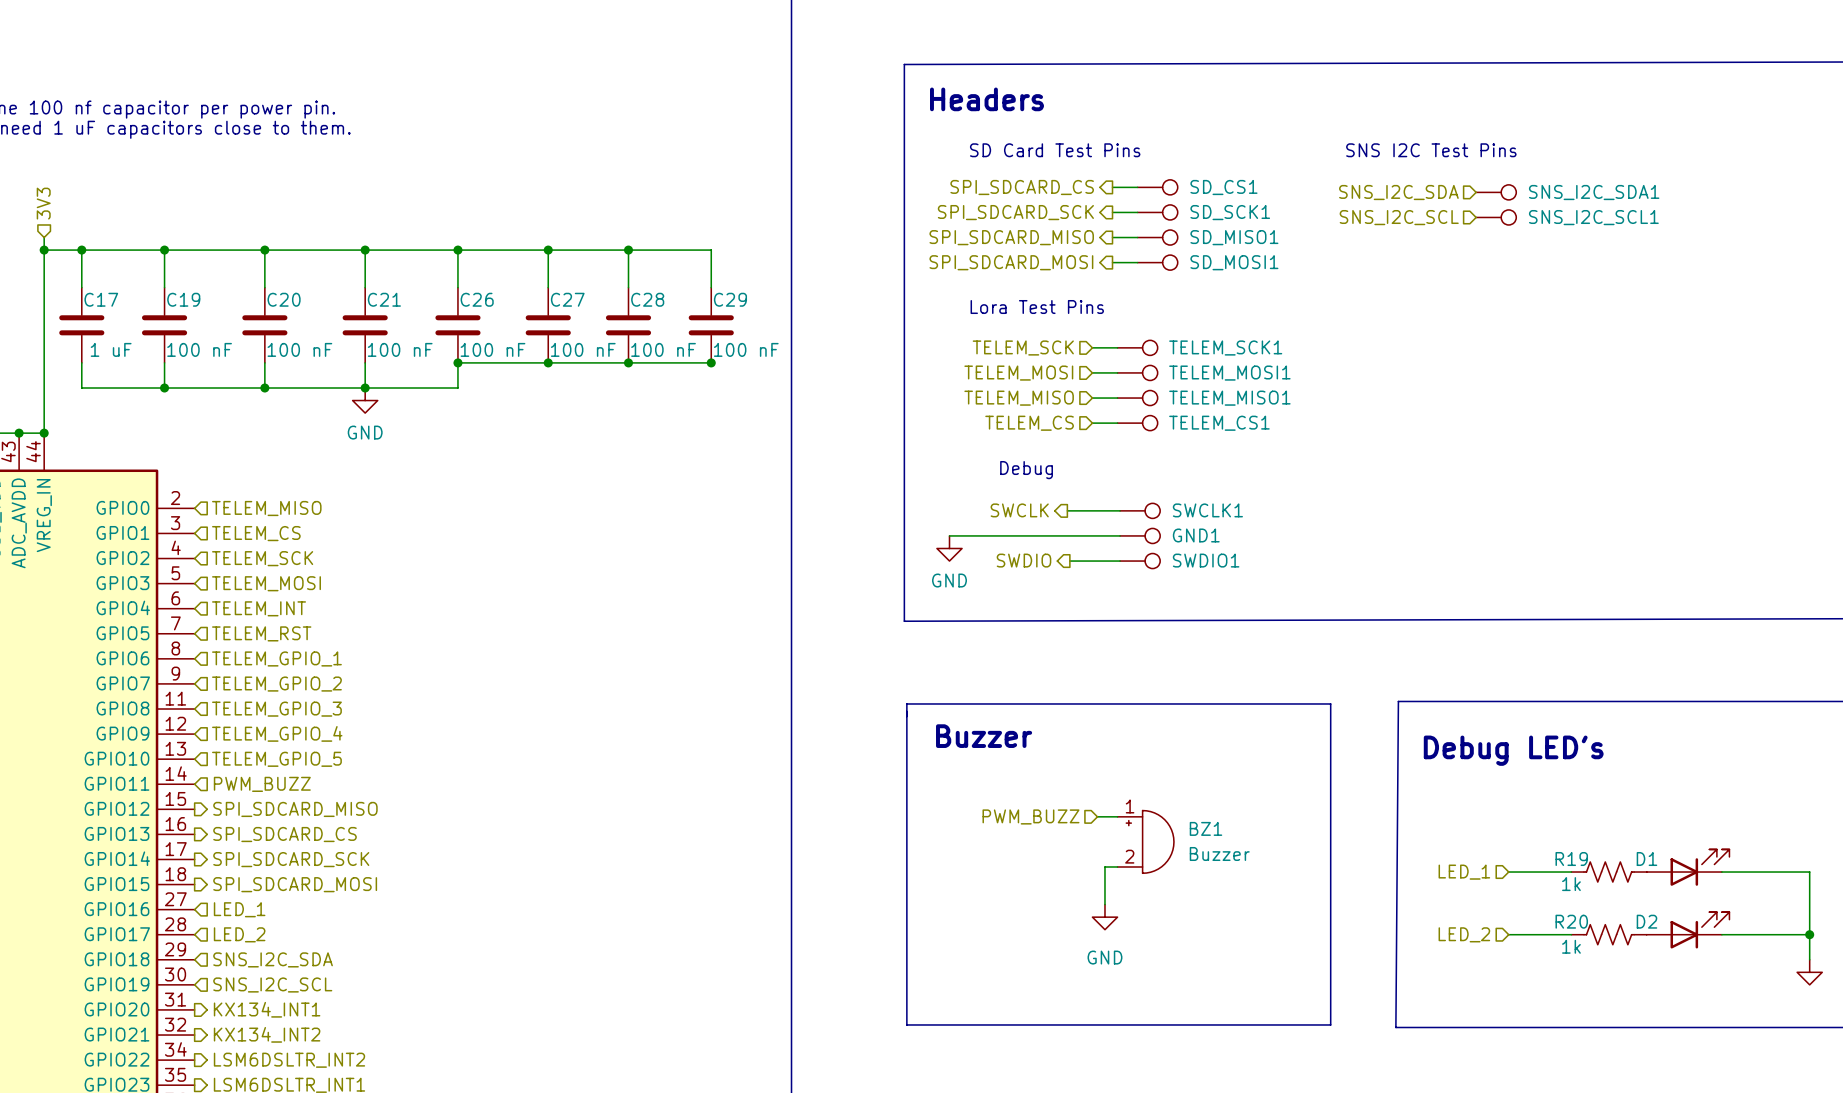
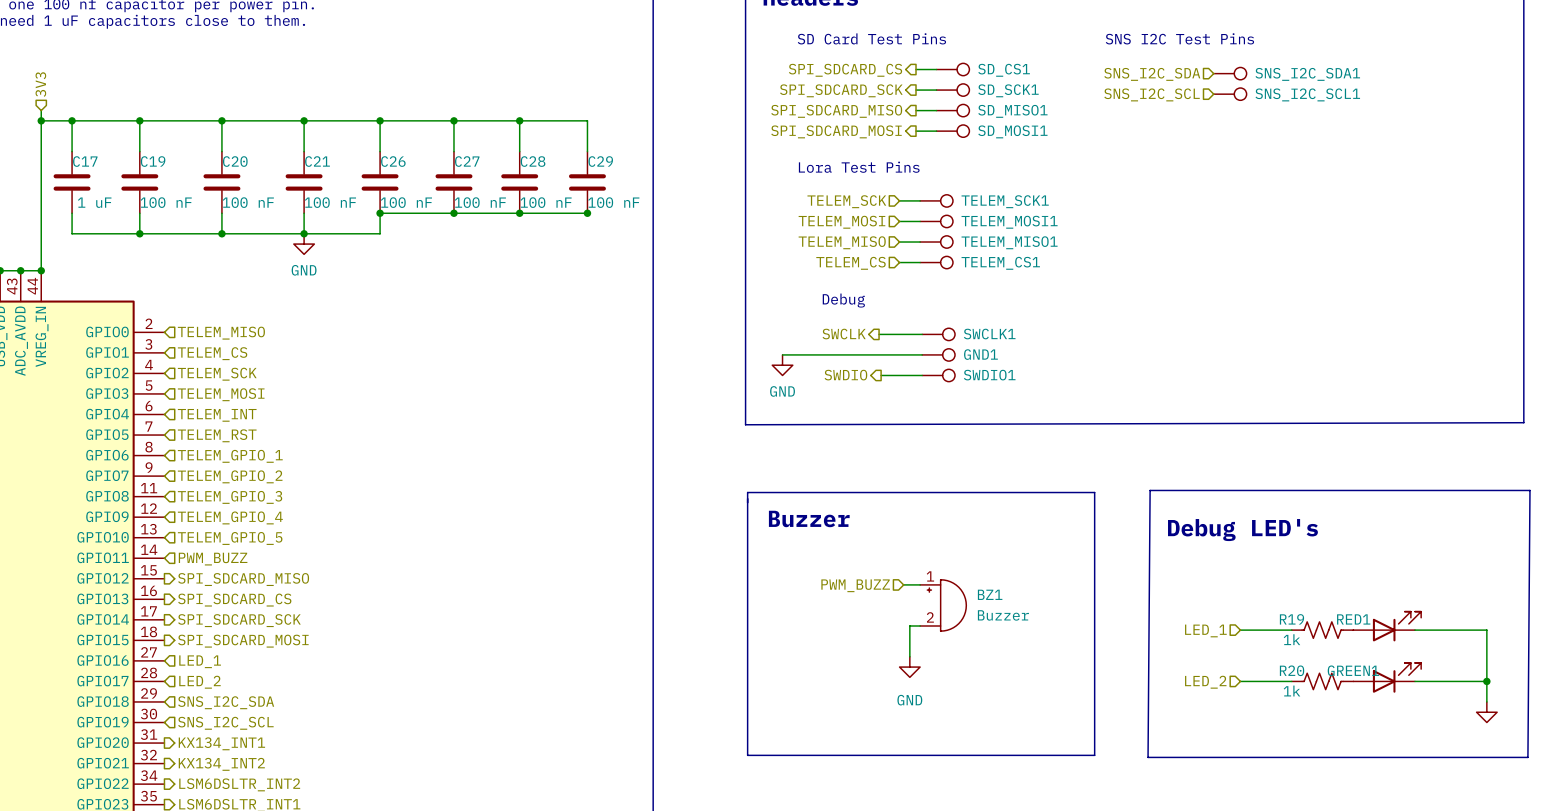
D1 name: D1 (1646, 859) -> RED1 (1353, 619)
D2 name: D2 (1646, 921) -> GREEN1 (1353, 670)

